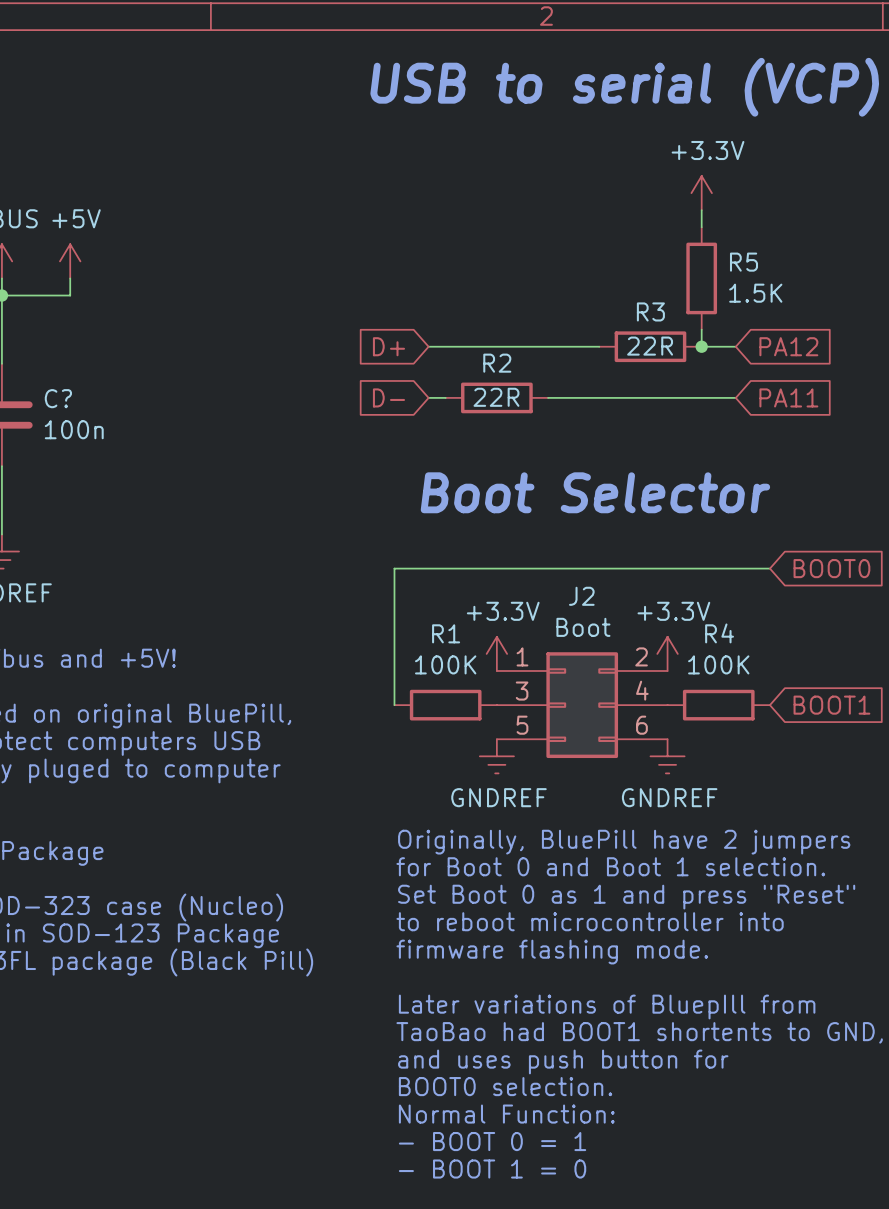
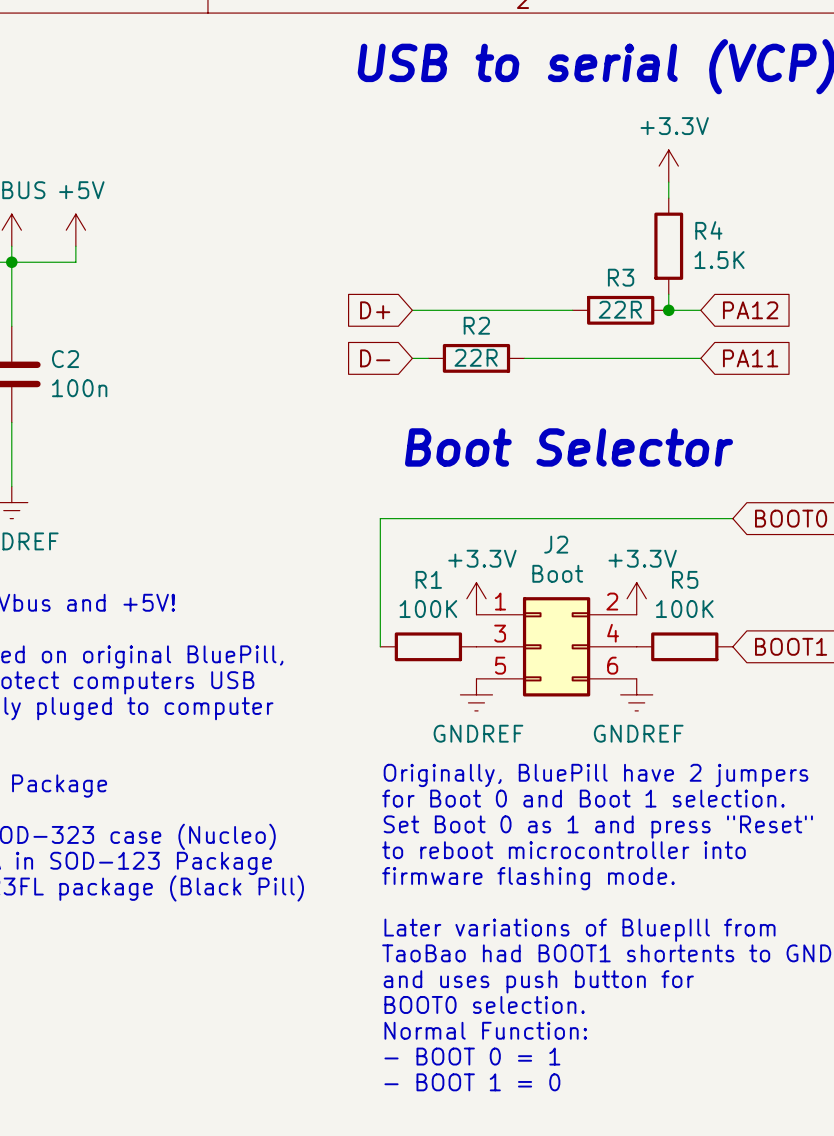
R5 name: R5 (743, 262) -> R4 (708, 230)
C? name: C? (58, 398) -> C2 (65, 359)
R4 name: R4 (719, 633) -> R5 (685, 579)

